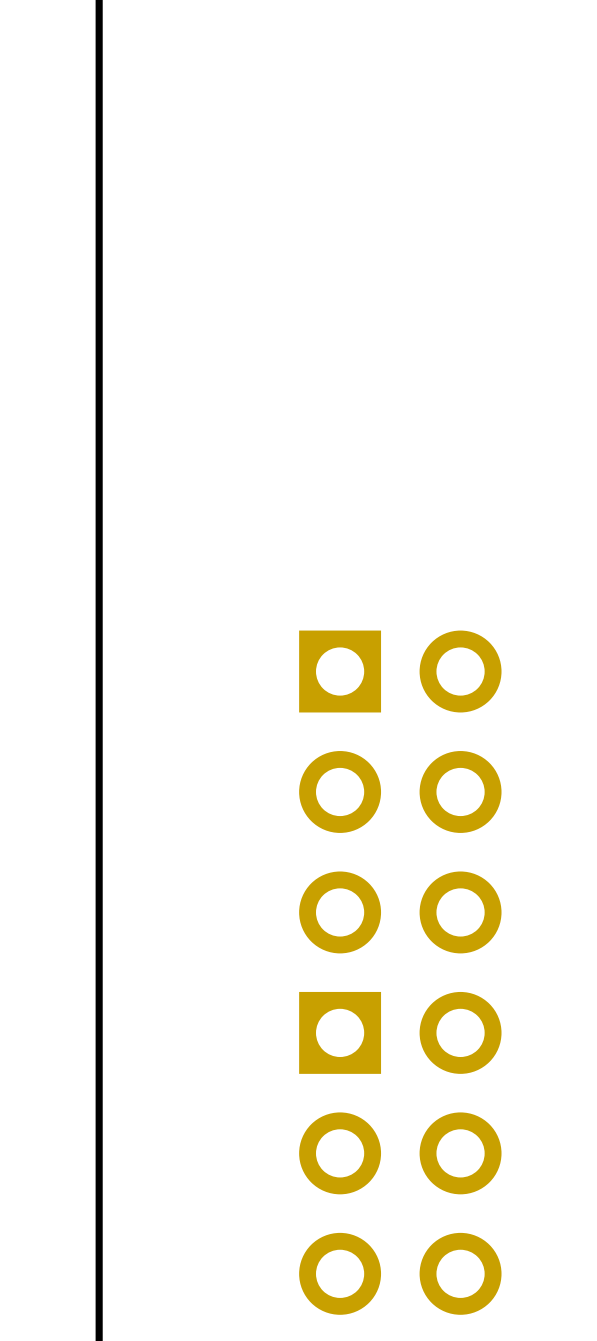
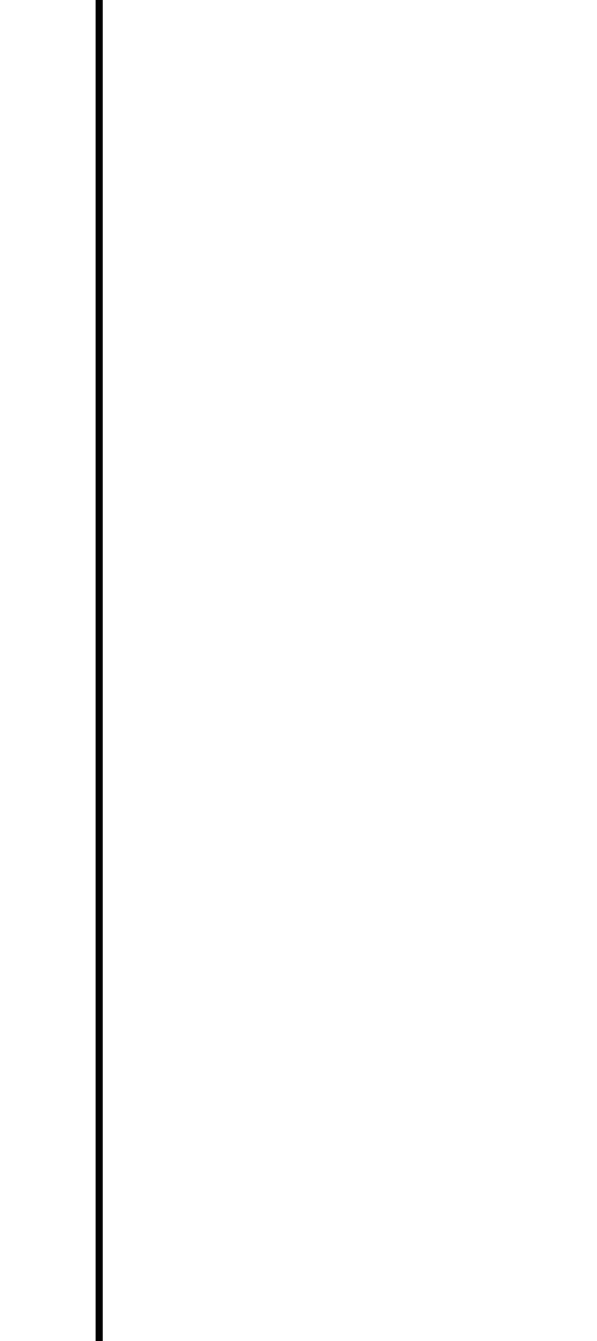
part: (400, 791) -> none
part: (400, 1153) -> none

